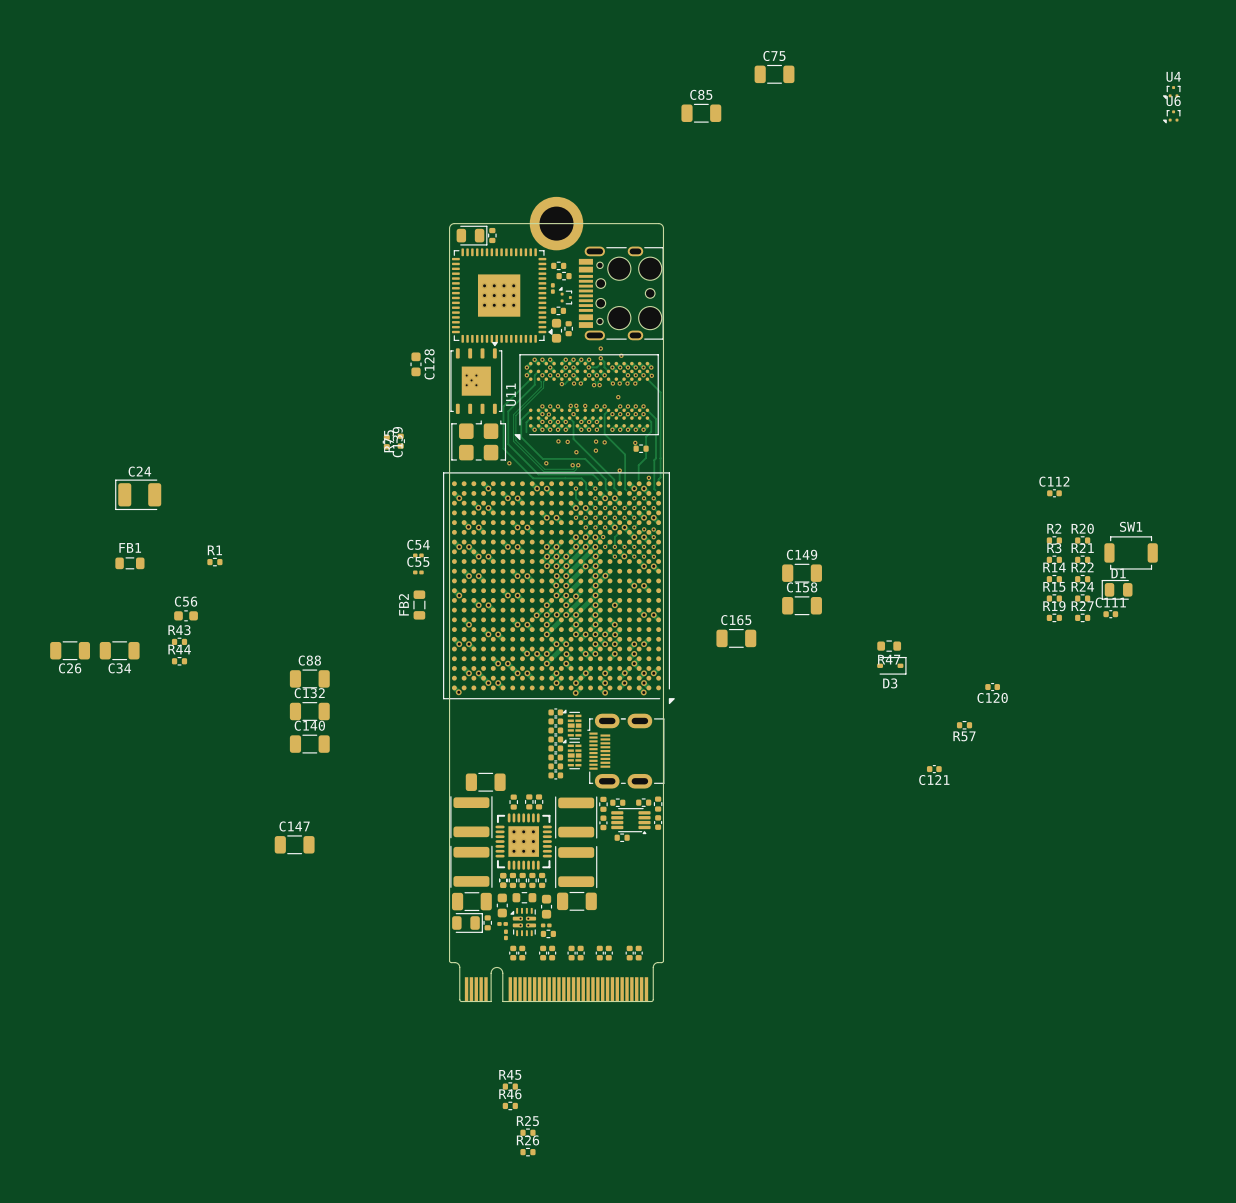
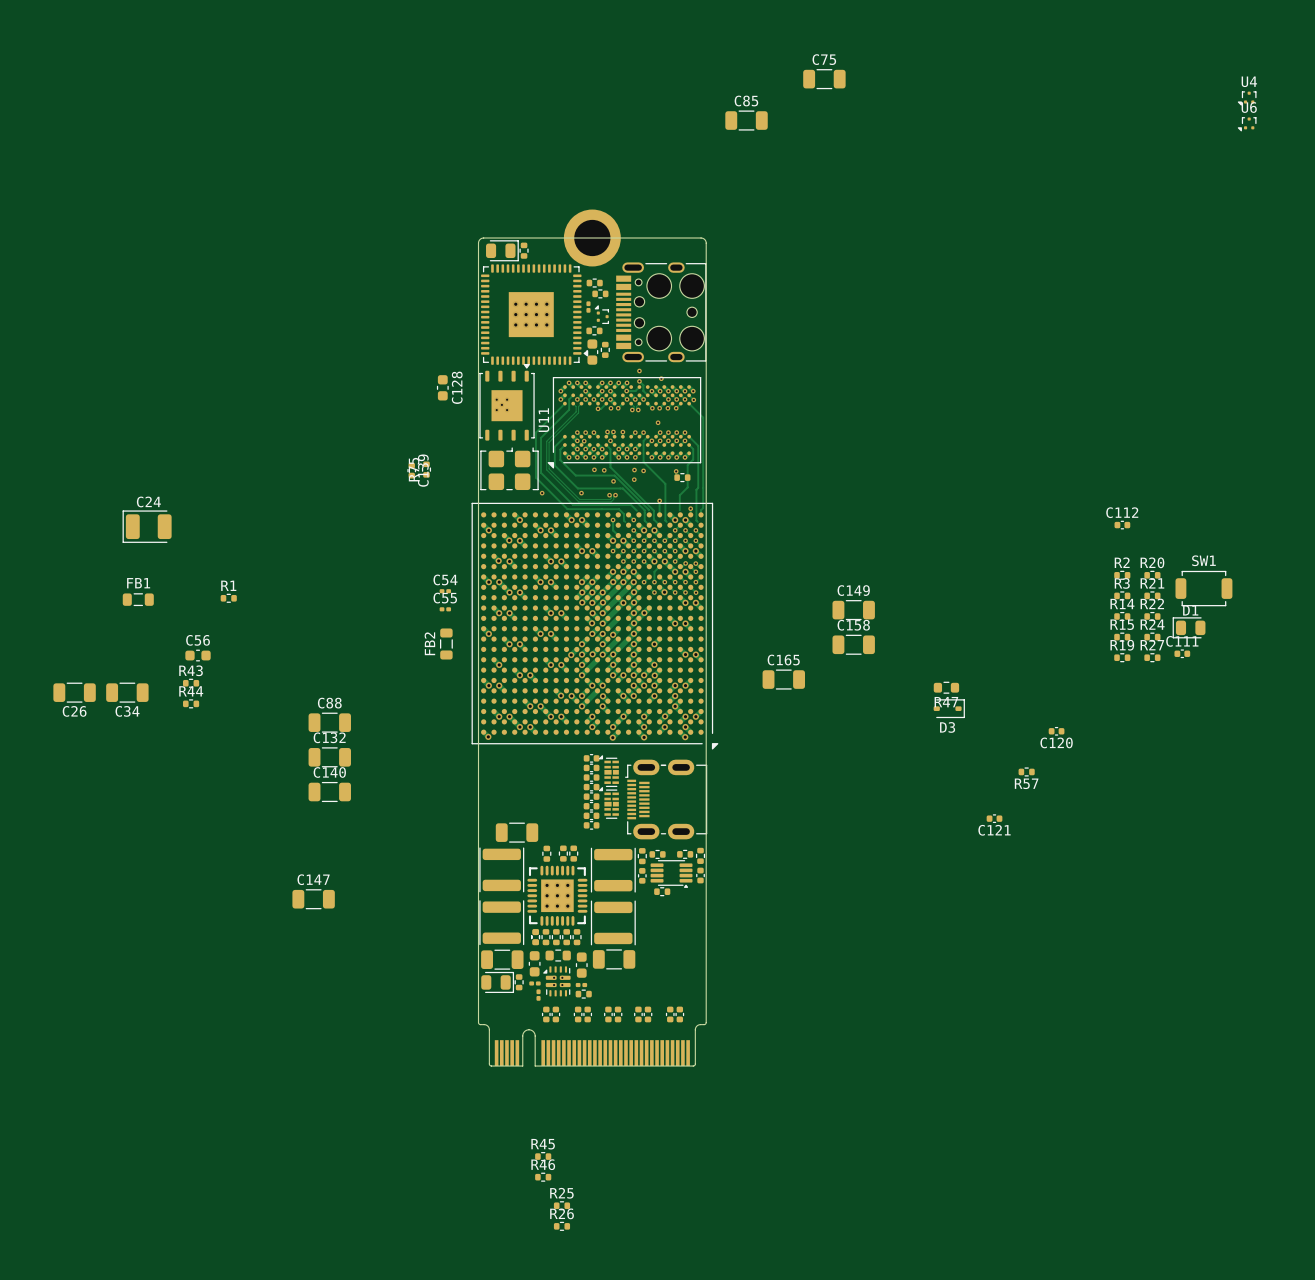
track: none -> (560, 460) (575, 475) (614, 475) (648, 510)
via: (603, 537) -> none

